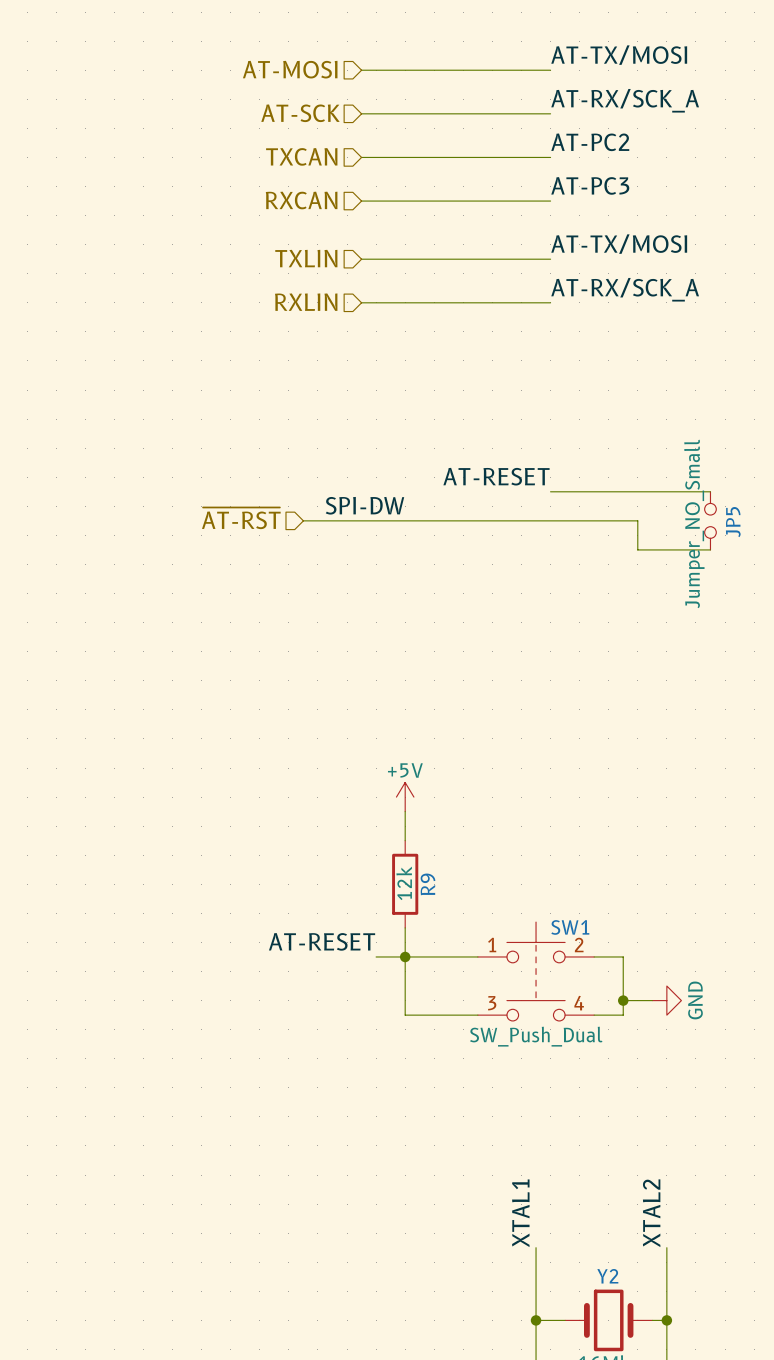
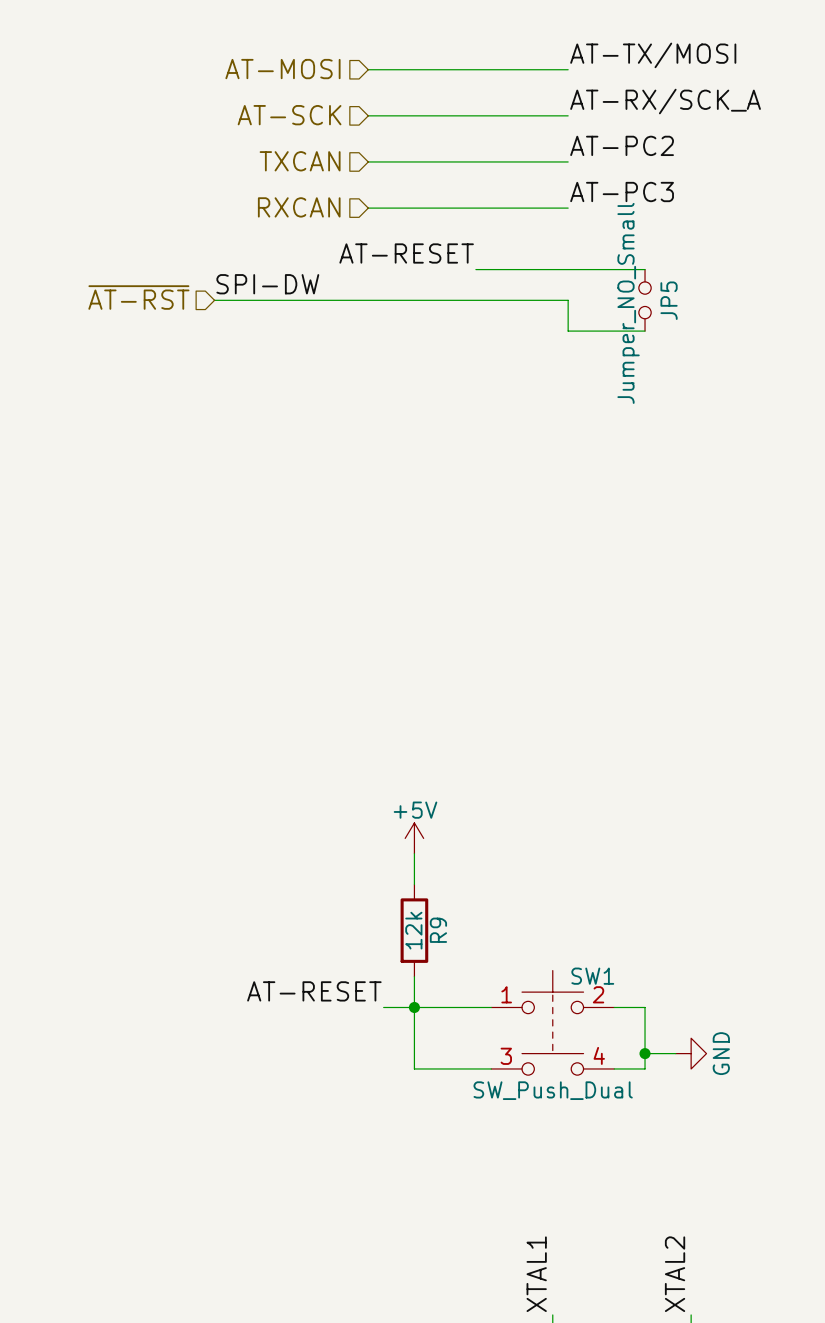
label: AT-TX/MOSI (619, 244) -> none
hierarchical label: TXLIN (306, 258) -> none
wire: (361, 259) (463, 259) -> none
wire: none -> (568, 269) (645, 269)
label: AT-RX/SCK_A (625, 289) -> none
hierarchical label: RXLIN (306, 302) -> none
wire: (361, 302) (550, 302) -> none
label position: AT-RESET (496, 476) -> AT-RESET (406, 253)
wire: (550, 491) (710, 491) -> none
label position: SPI-DW (365, 505) -> SPI-DW (267, 284)
hierarchical label position: ~{AT-RST} (241, 518) -> ~{AT-RST} (138, 297)
wire: (303, 520) (637, 520) (637, 549) (710, 549) -> (214, 300) (568, 300) (568, 331) (645, 331)
JP5 position: (710, 520) -> (645, 300)

